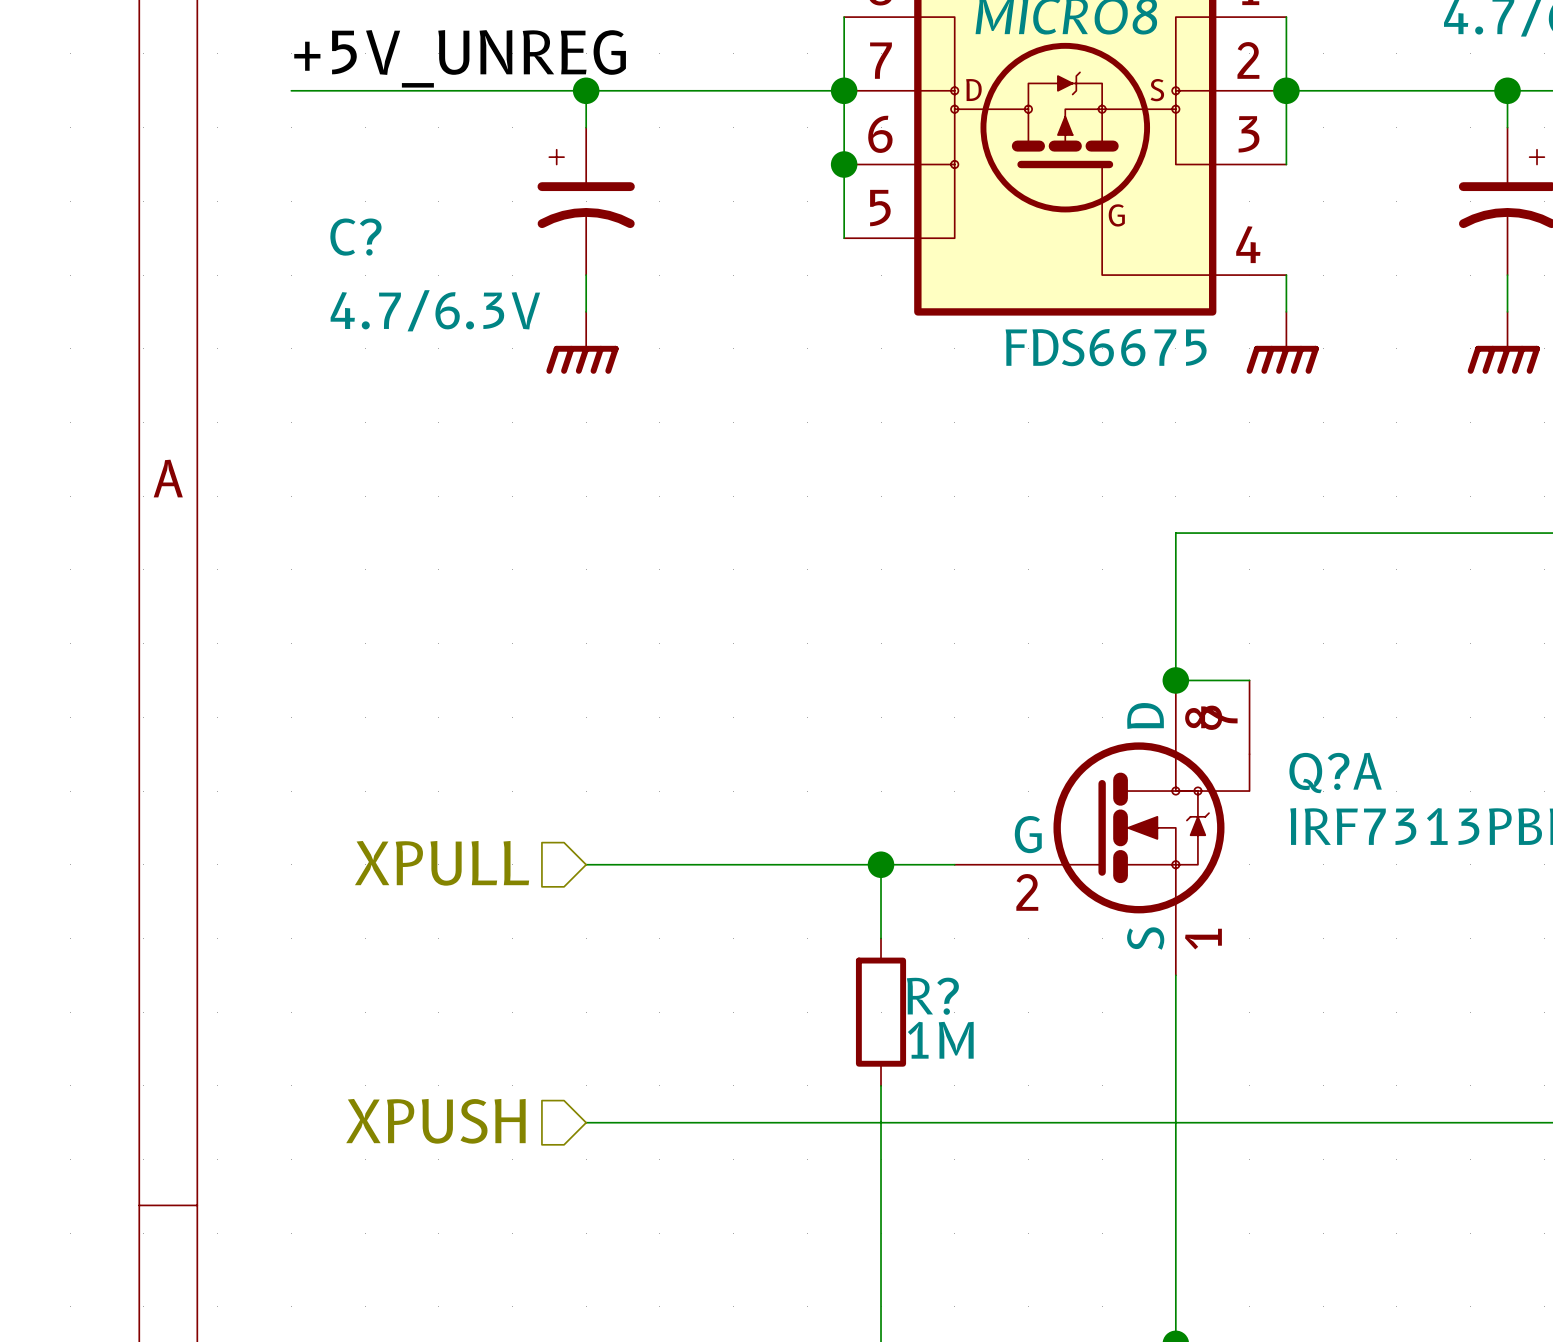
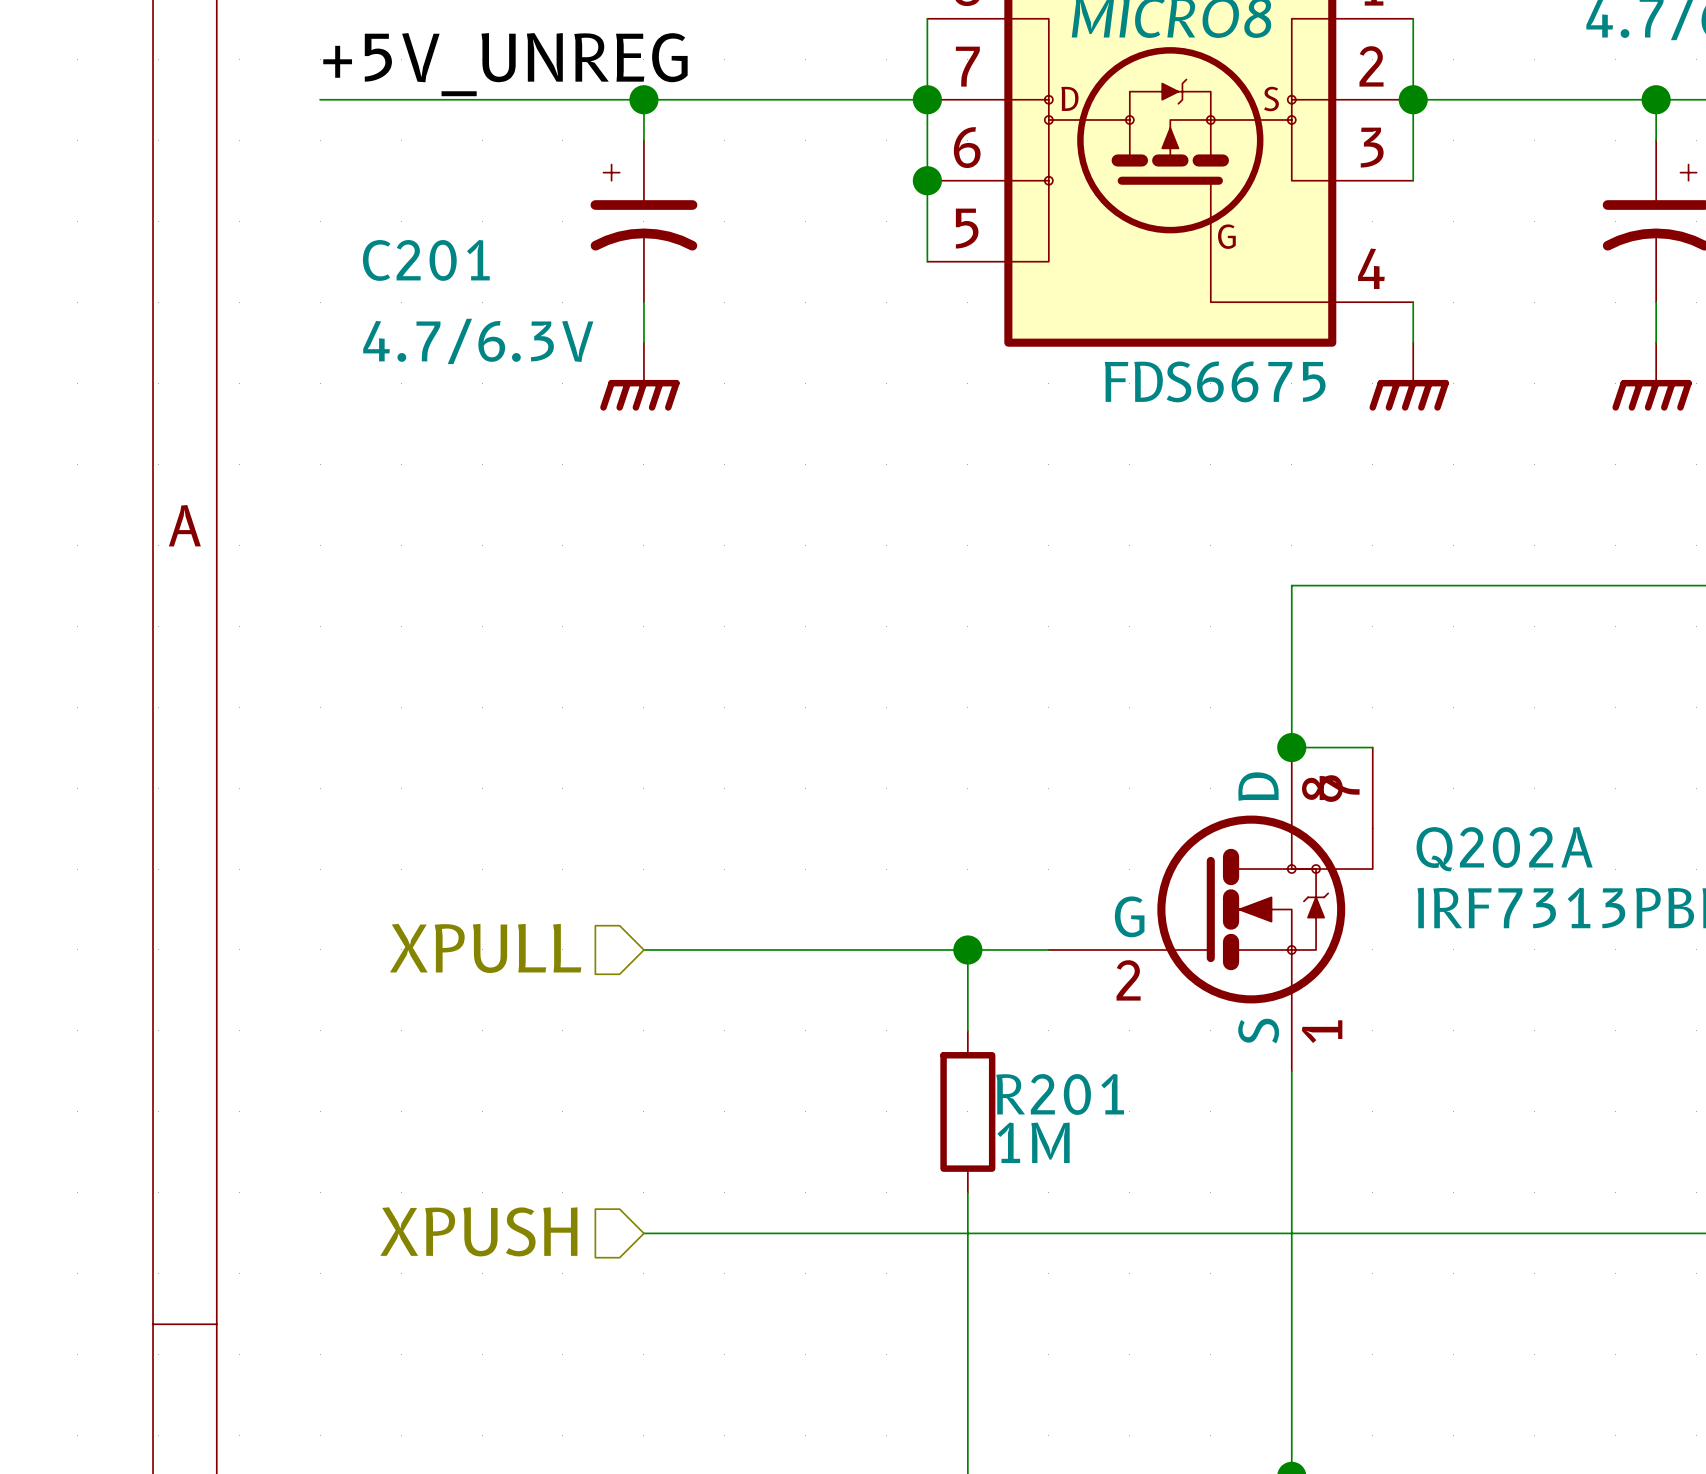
C? name: C? (355, 237) -> C201 (426, 260)
Q?A name: Q?A (1335, 772) -> Q202A (1504, 849)
R? name: R? (932, 996) -> R201 (1060, 1094)

